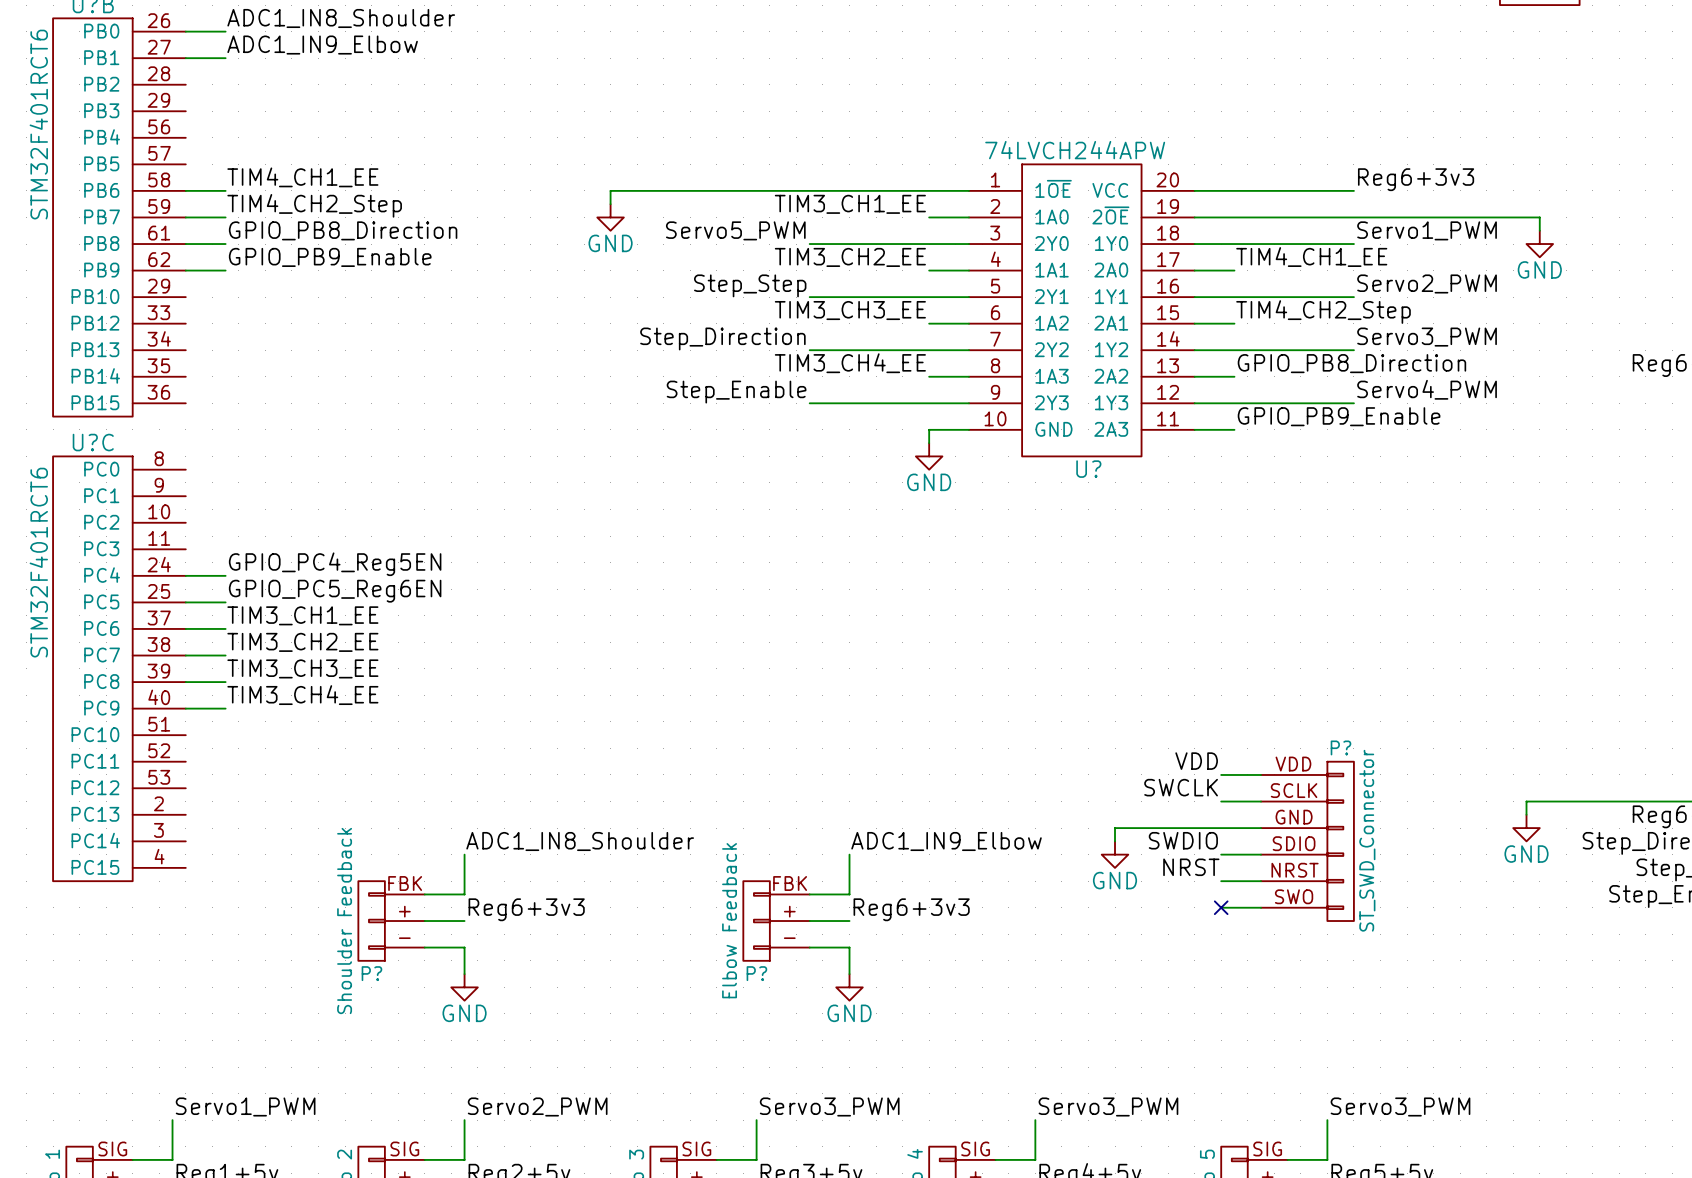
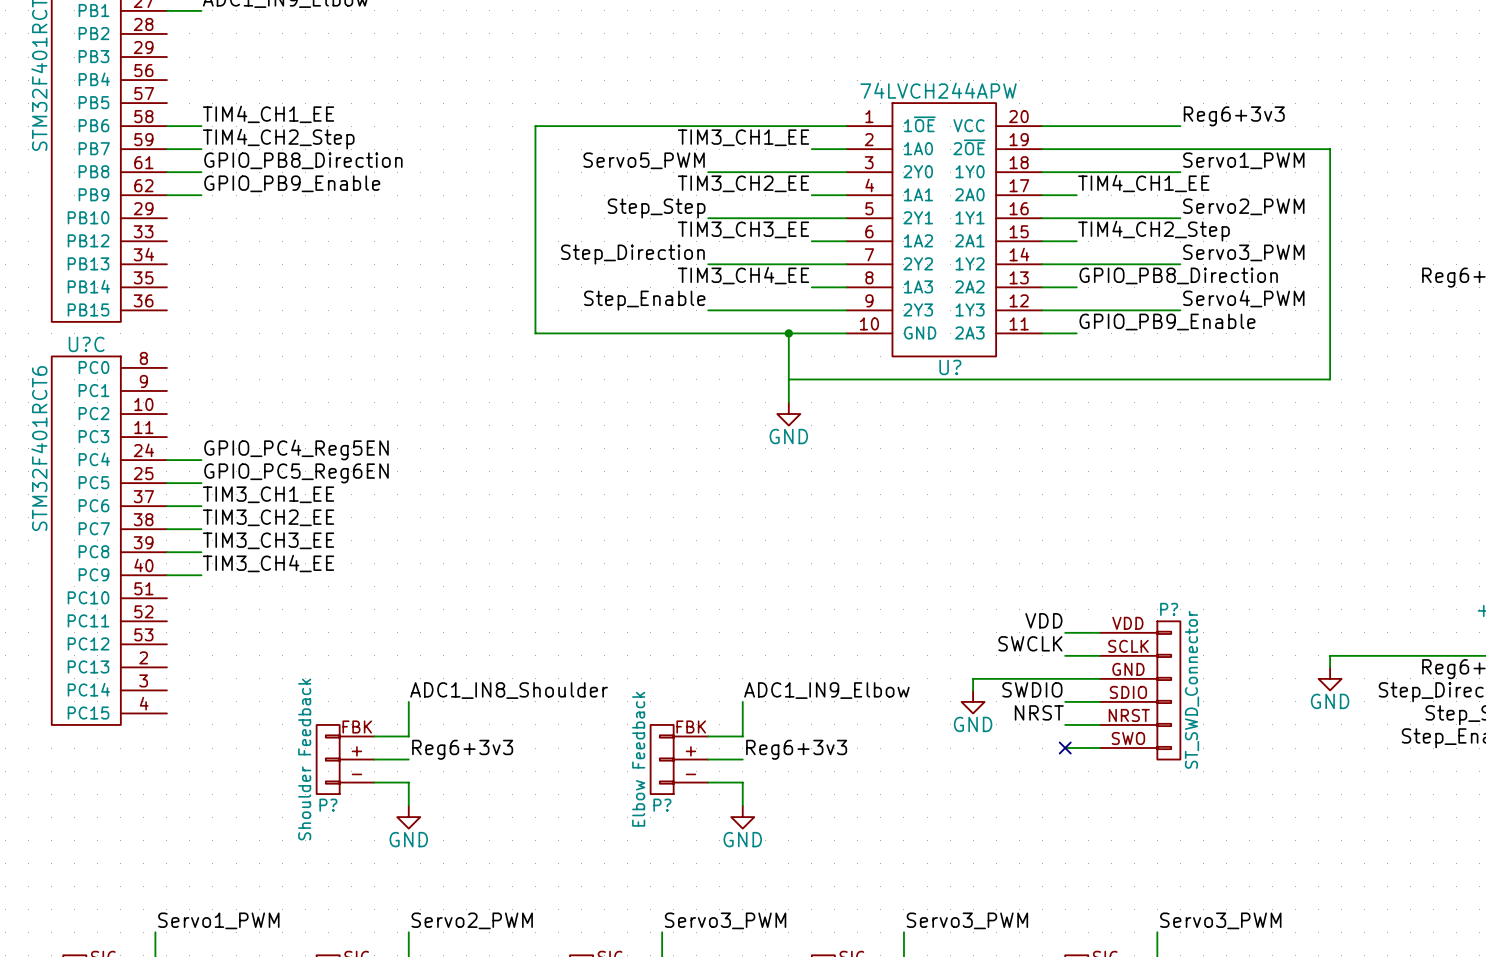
power symbol: GND (610, 217) -> none
wire: (1526, 217) (1539, 217) (1539, 230) -> (1330, 149) (1330, 379) (788, 379)
power symbol: GND (1539, 244) -> none
wire: none -> (788, 333) (788, 402)
junction: none -> (788, 333)
wire: (929, 429) (929, 443) -> (811, 333) (535, 333) (535, 137)
power symbol position: GND (929, 456) -> GND (788, 414)

